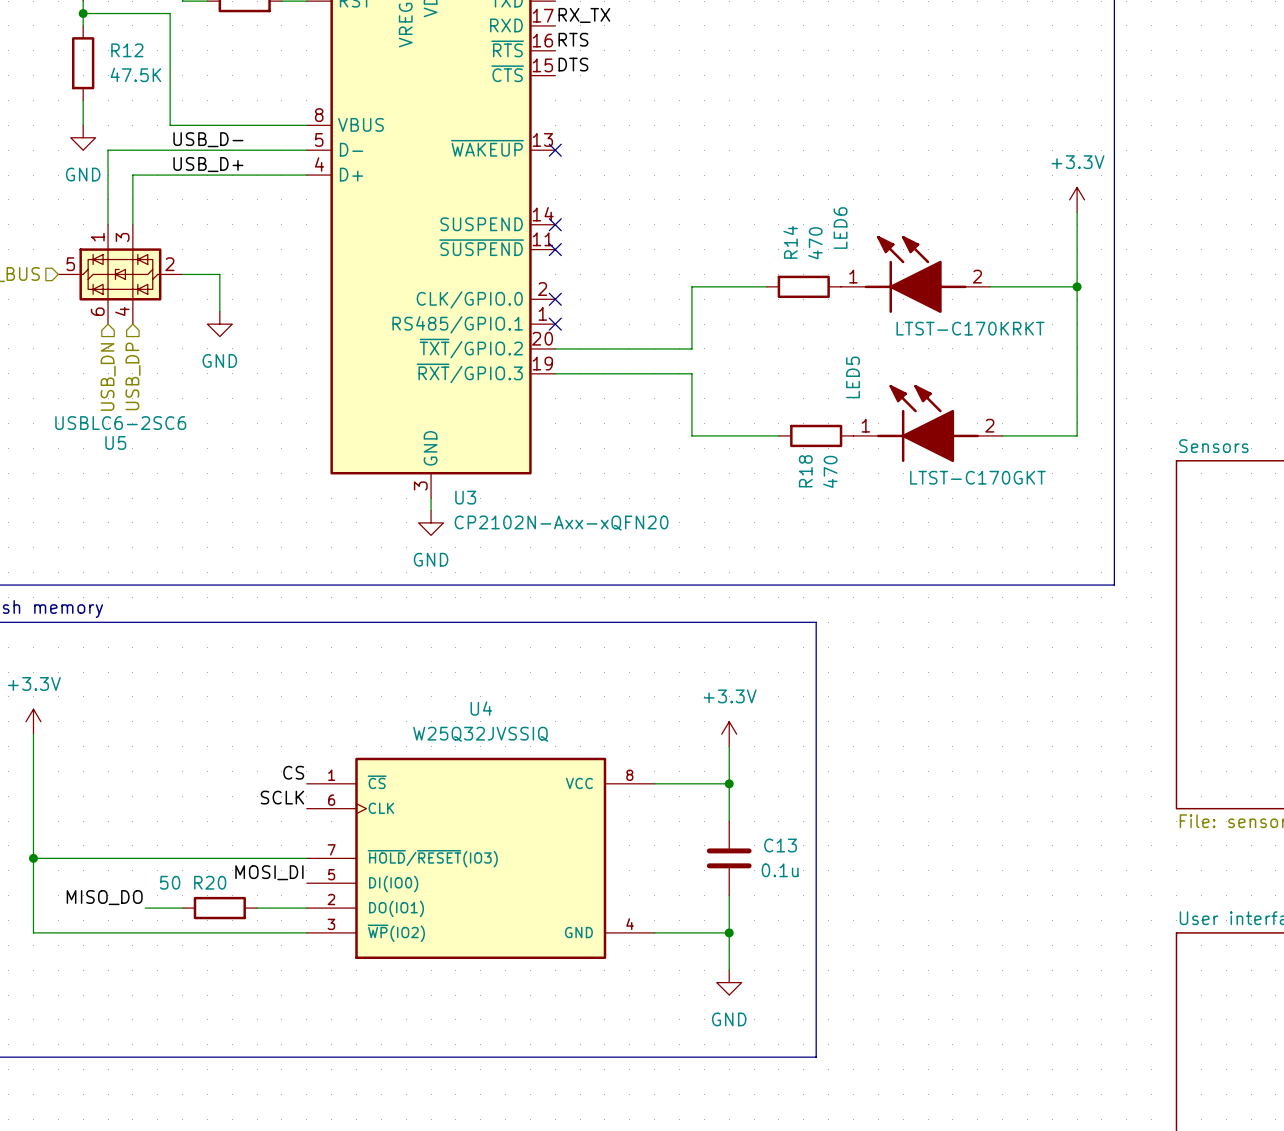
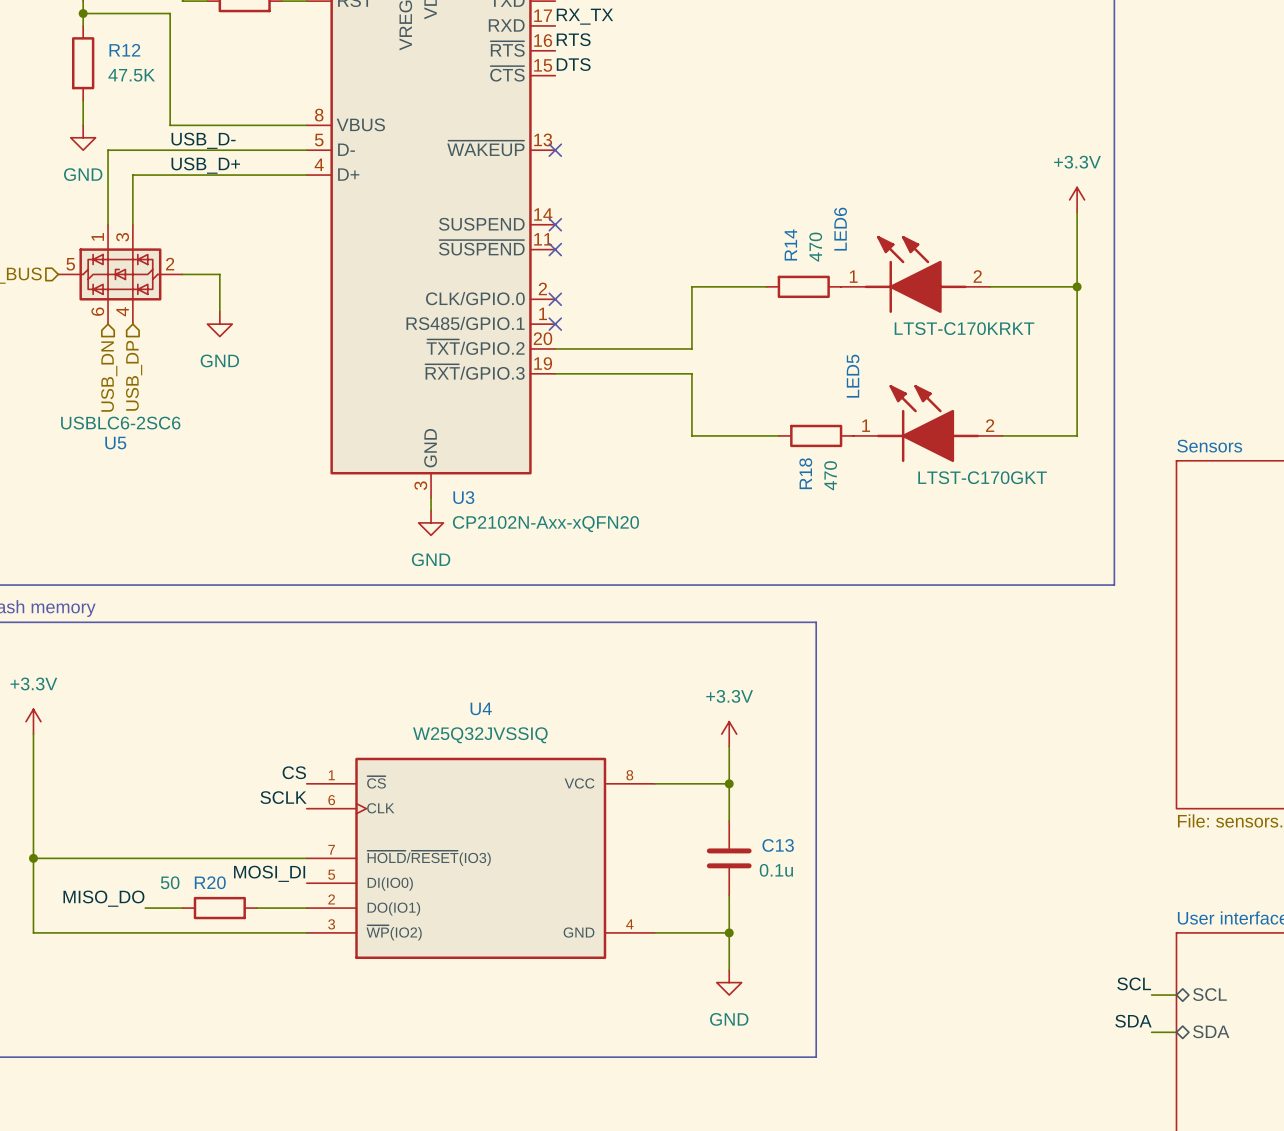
label: none -> SCL (1134, 983)
sheet pin: none -> SCL (1209, 994)
wire: none -> (1151, 995) (1176, 995)
label: none -> SDA (1133, 1021)
sheet pin: none -> SDA (1211, 1031)
wire: none -> (1151, 1032) (1176, 1032)

